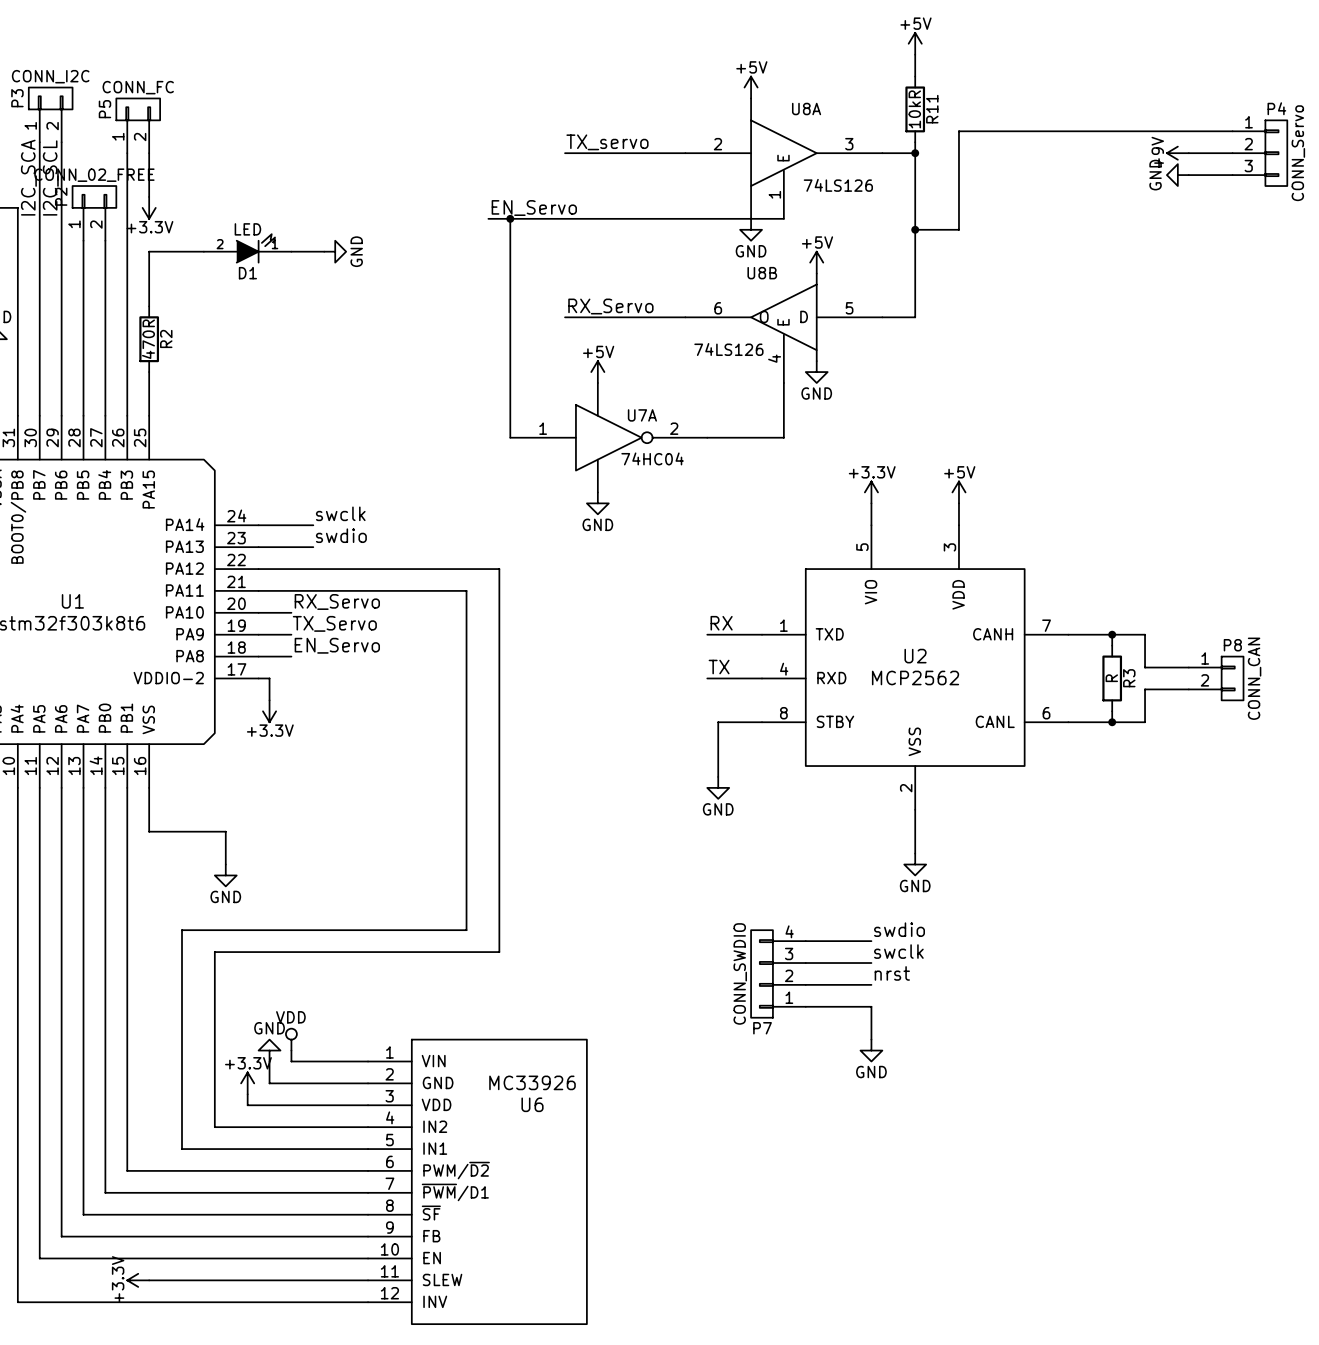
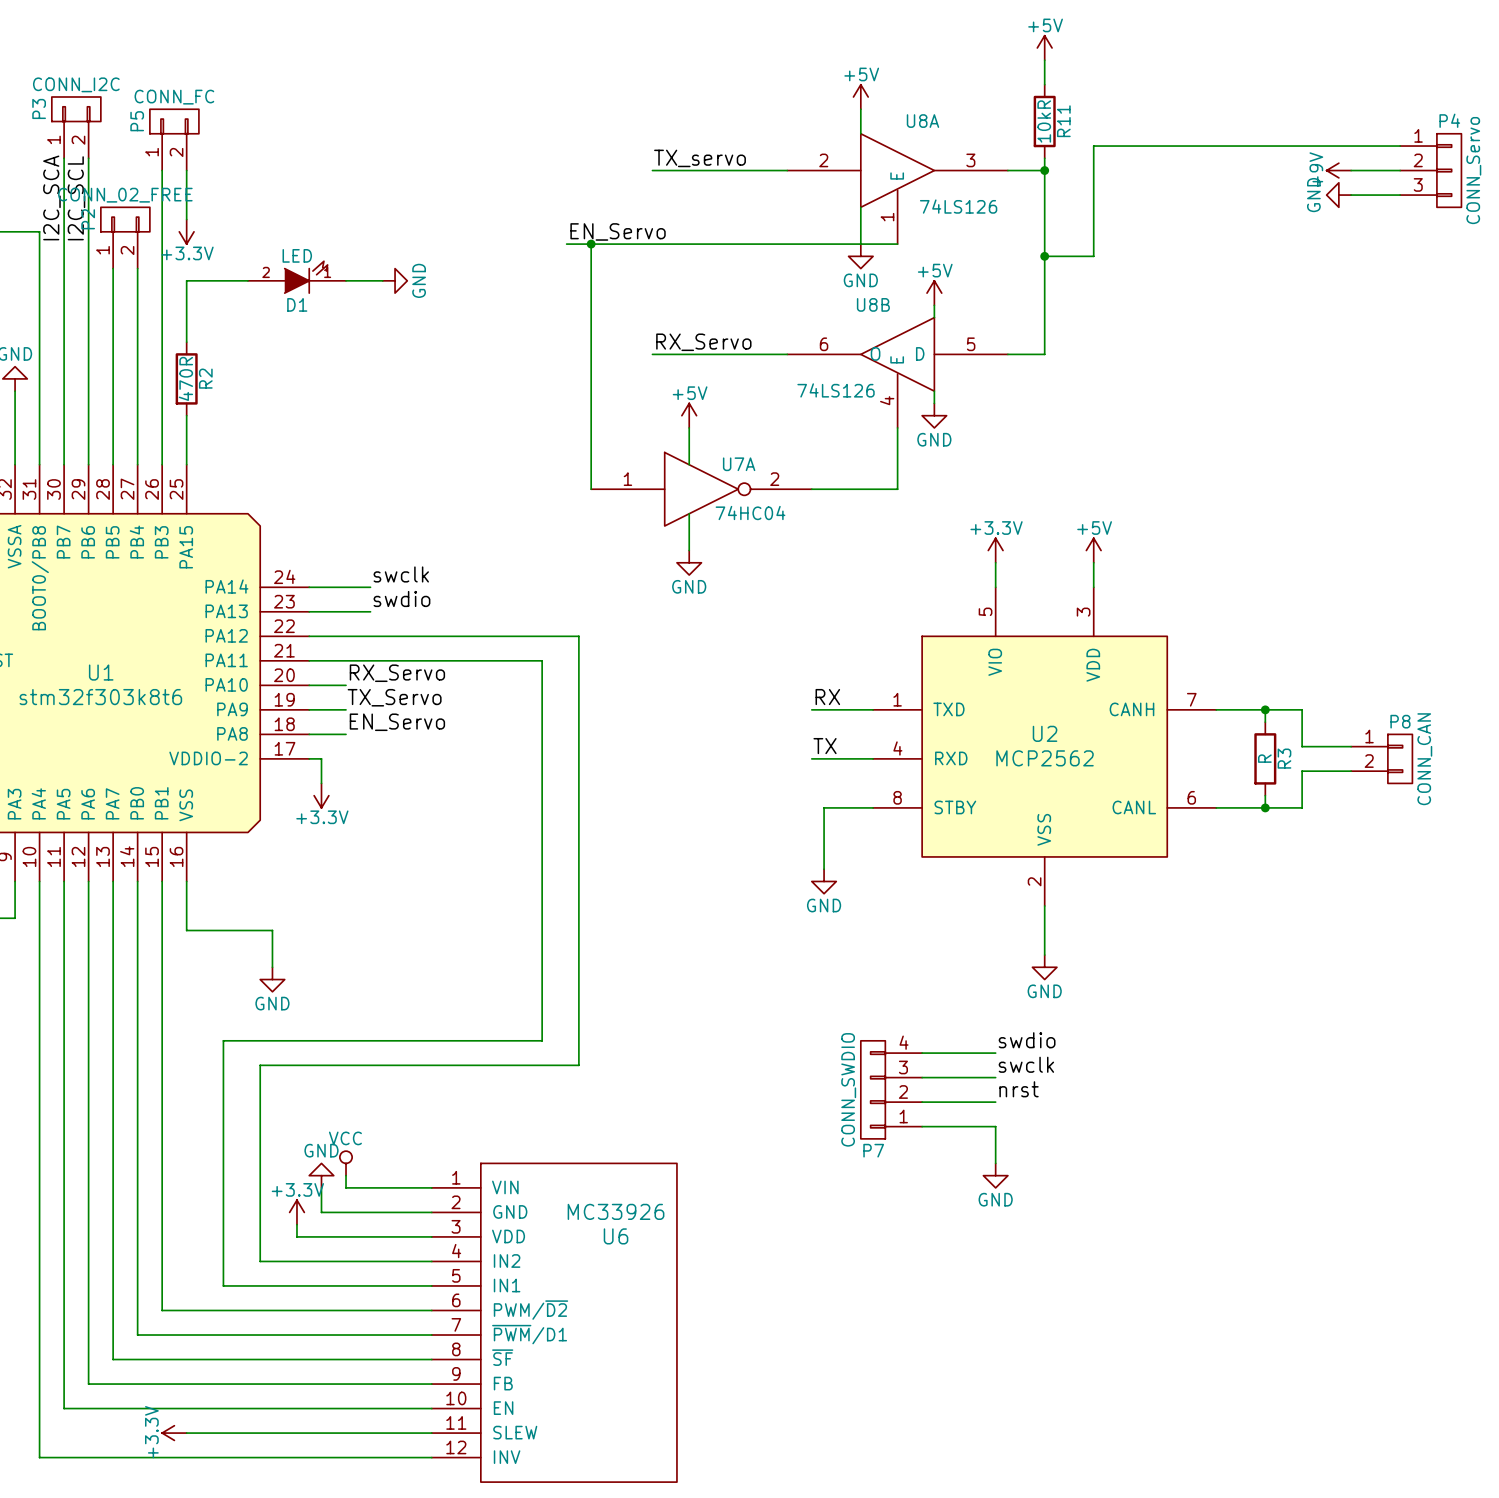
power symbol: VDD (291, 1039) -> VCC (346, 1163)

